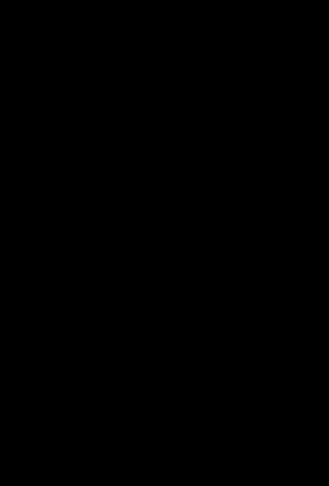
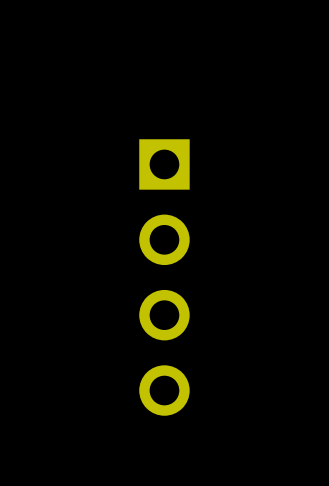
part: none -> (164, 277)

